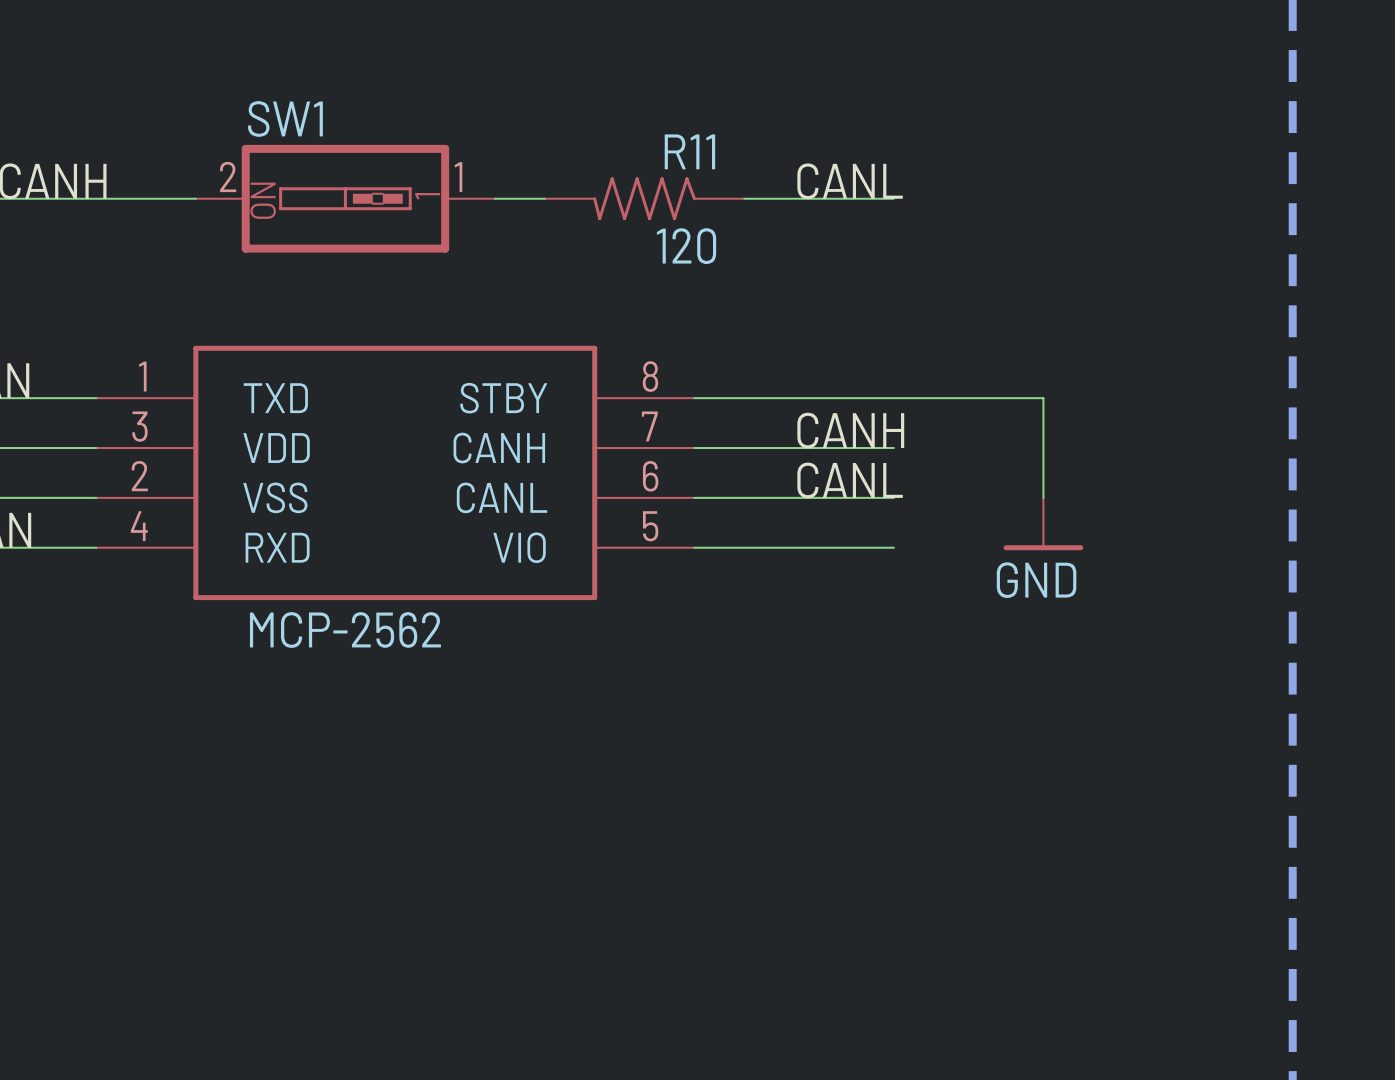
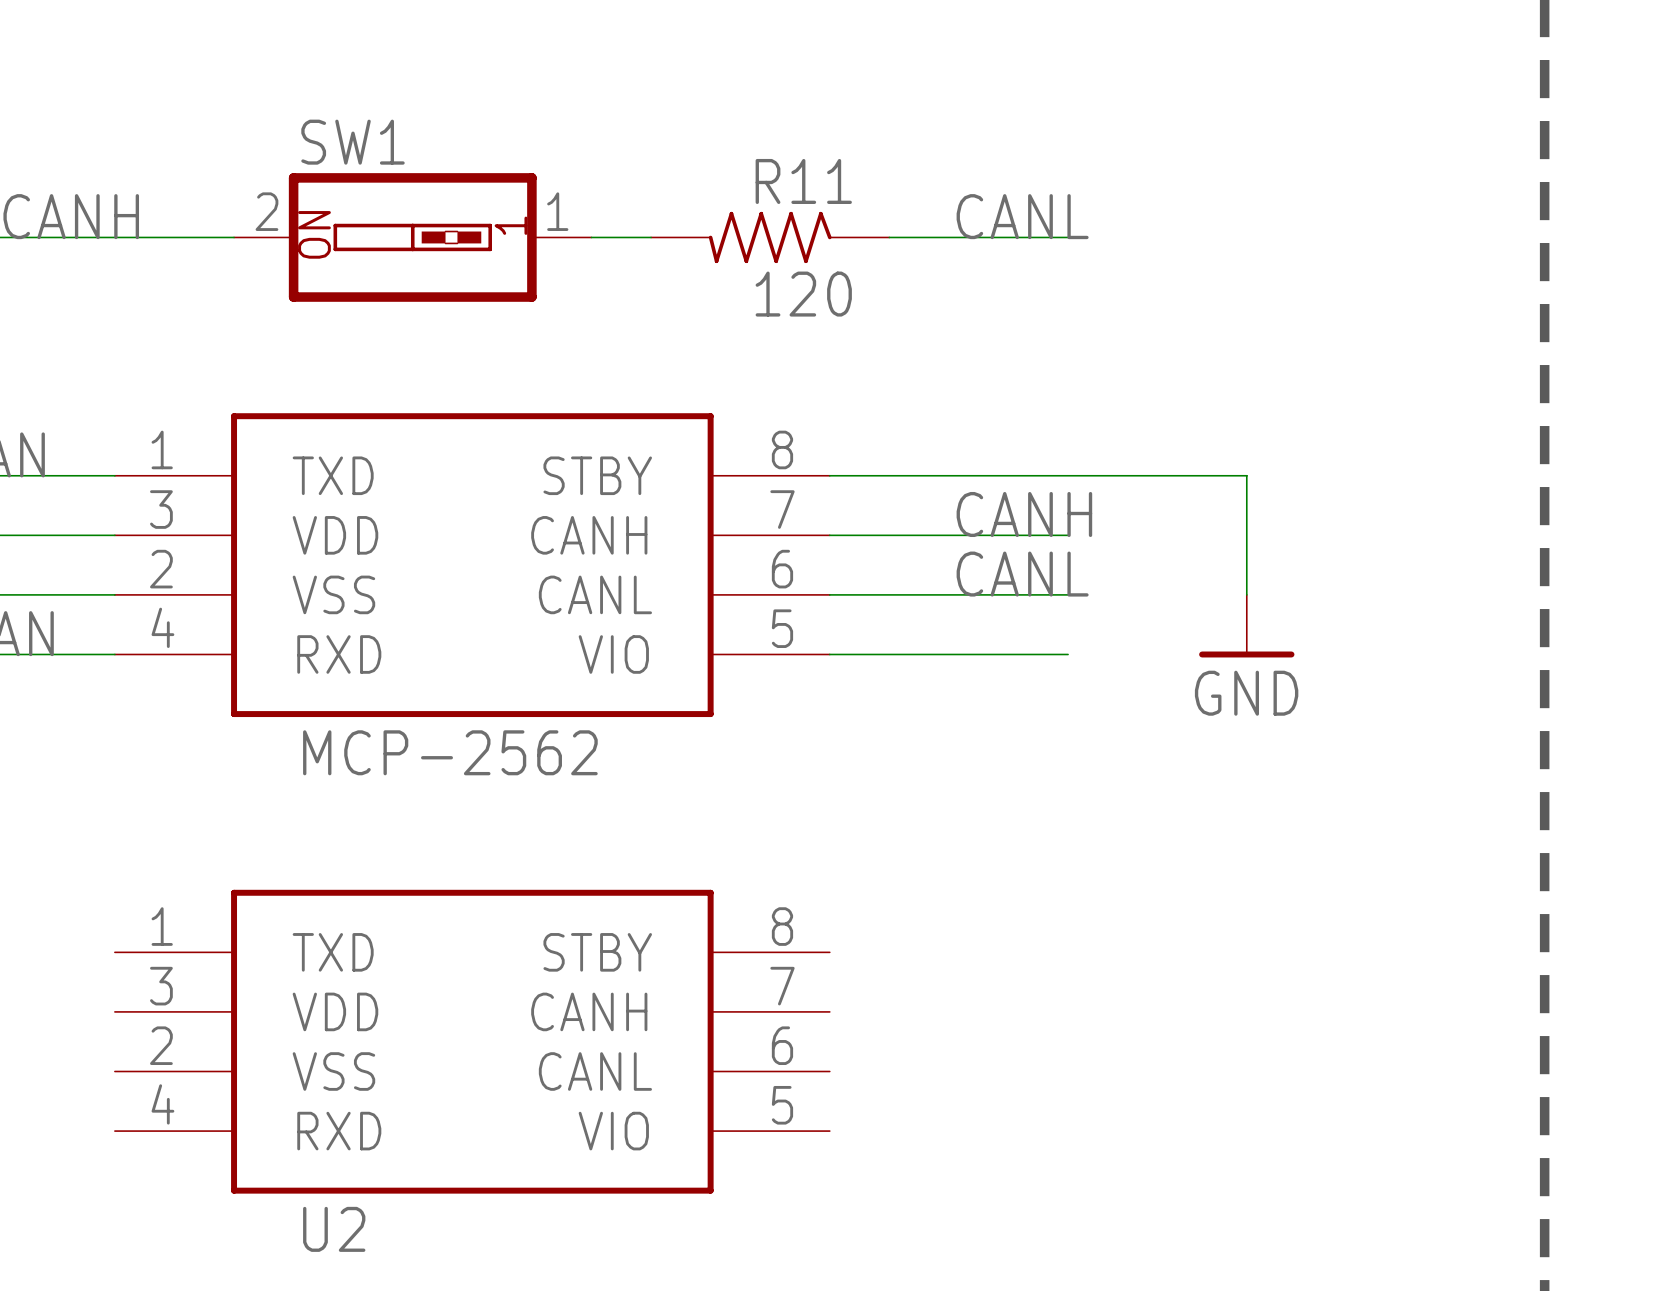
U2: none -> (472, 1041)

